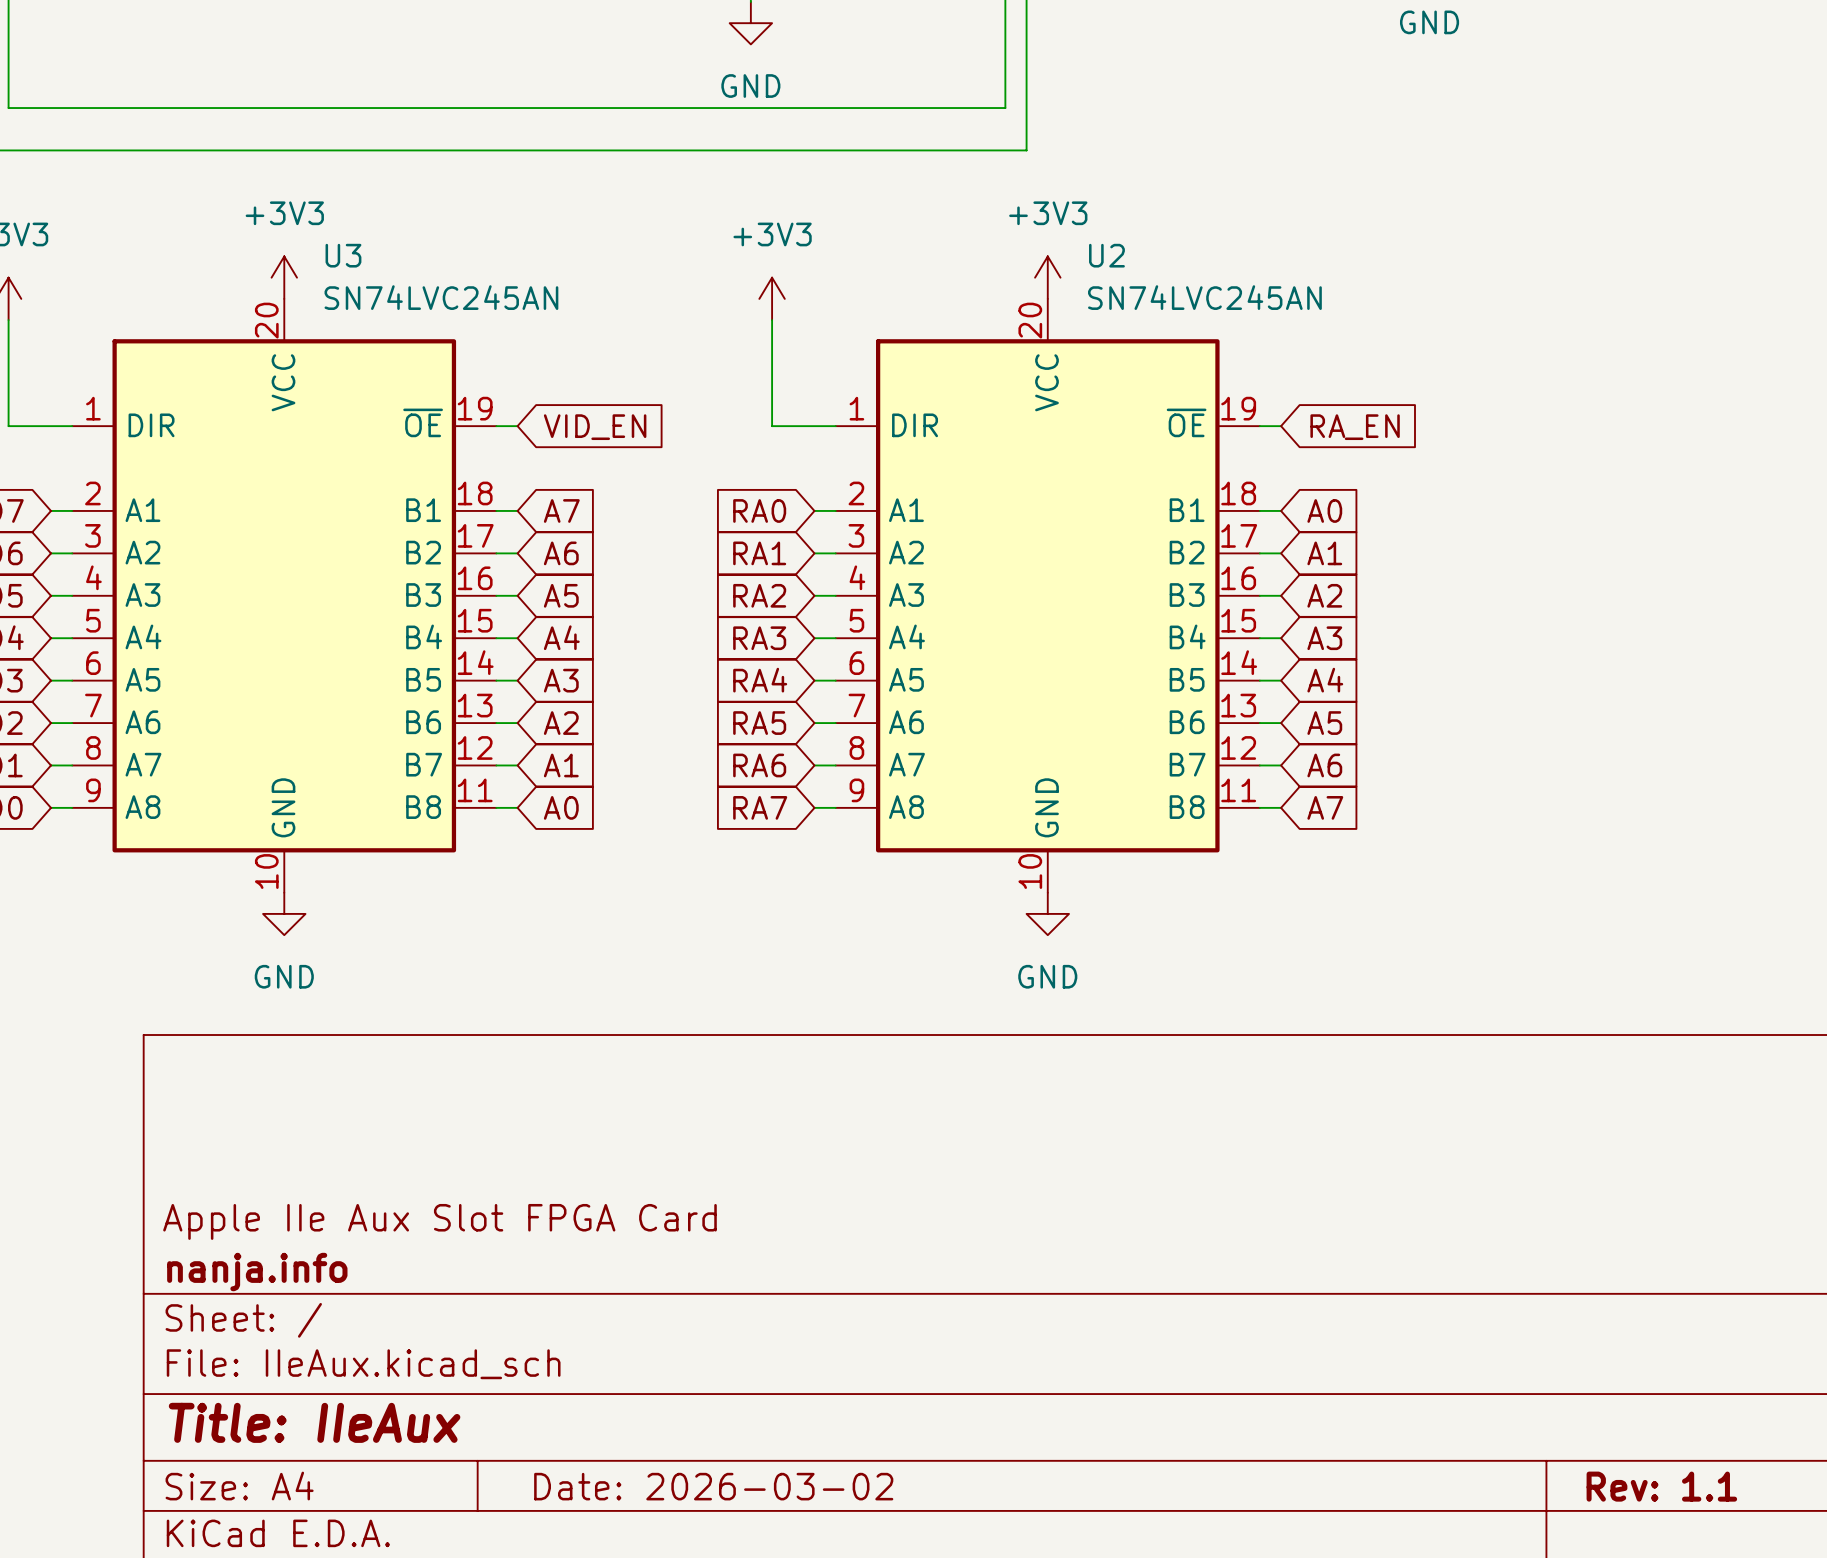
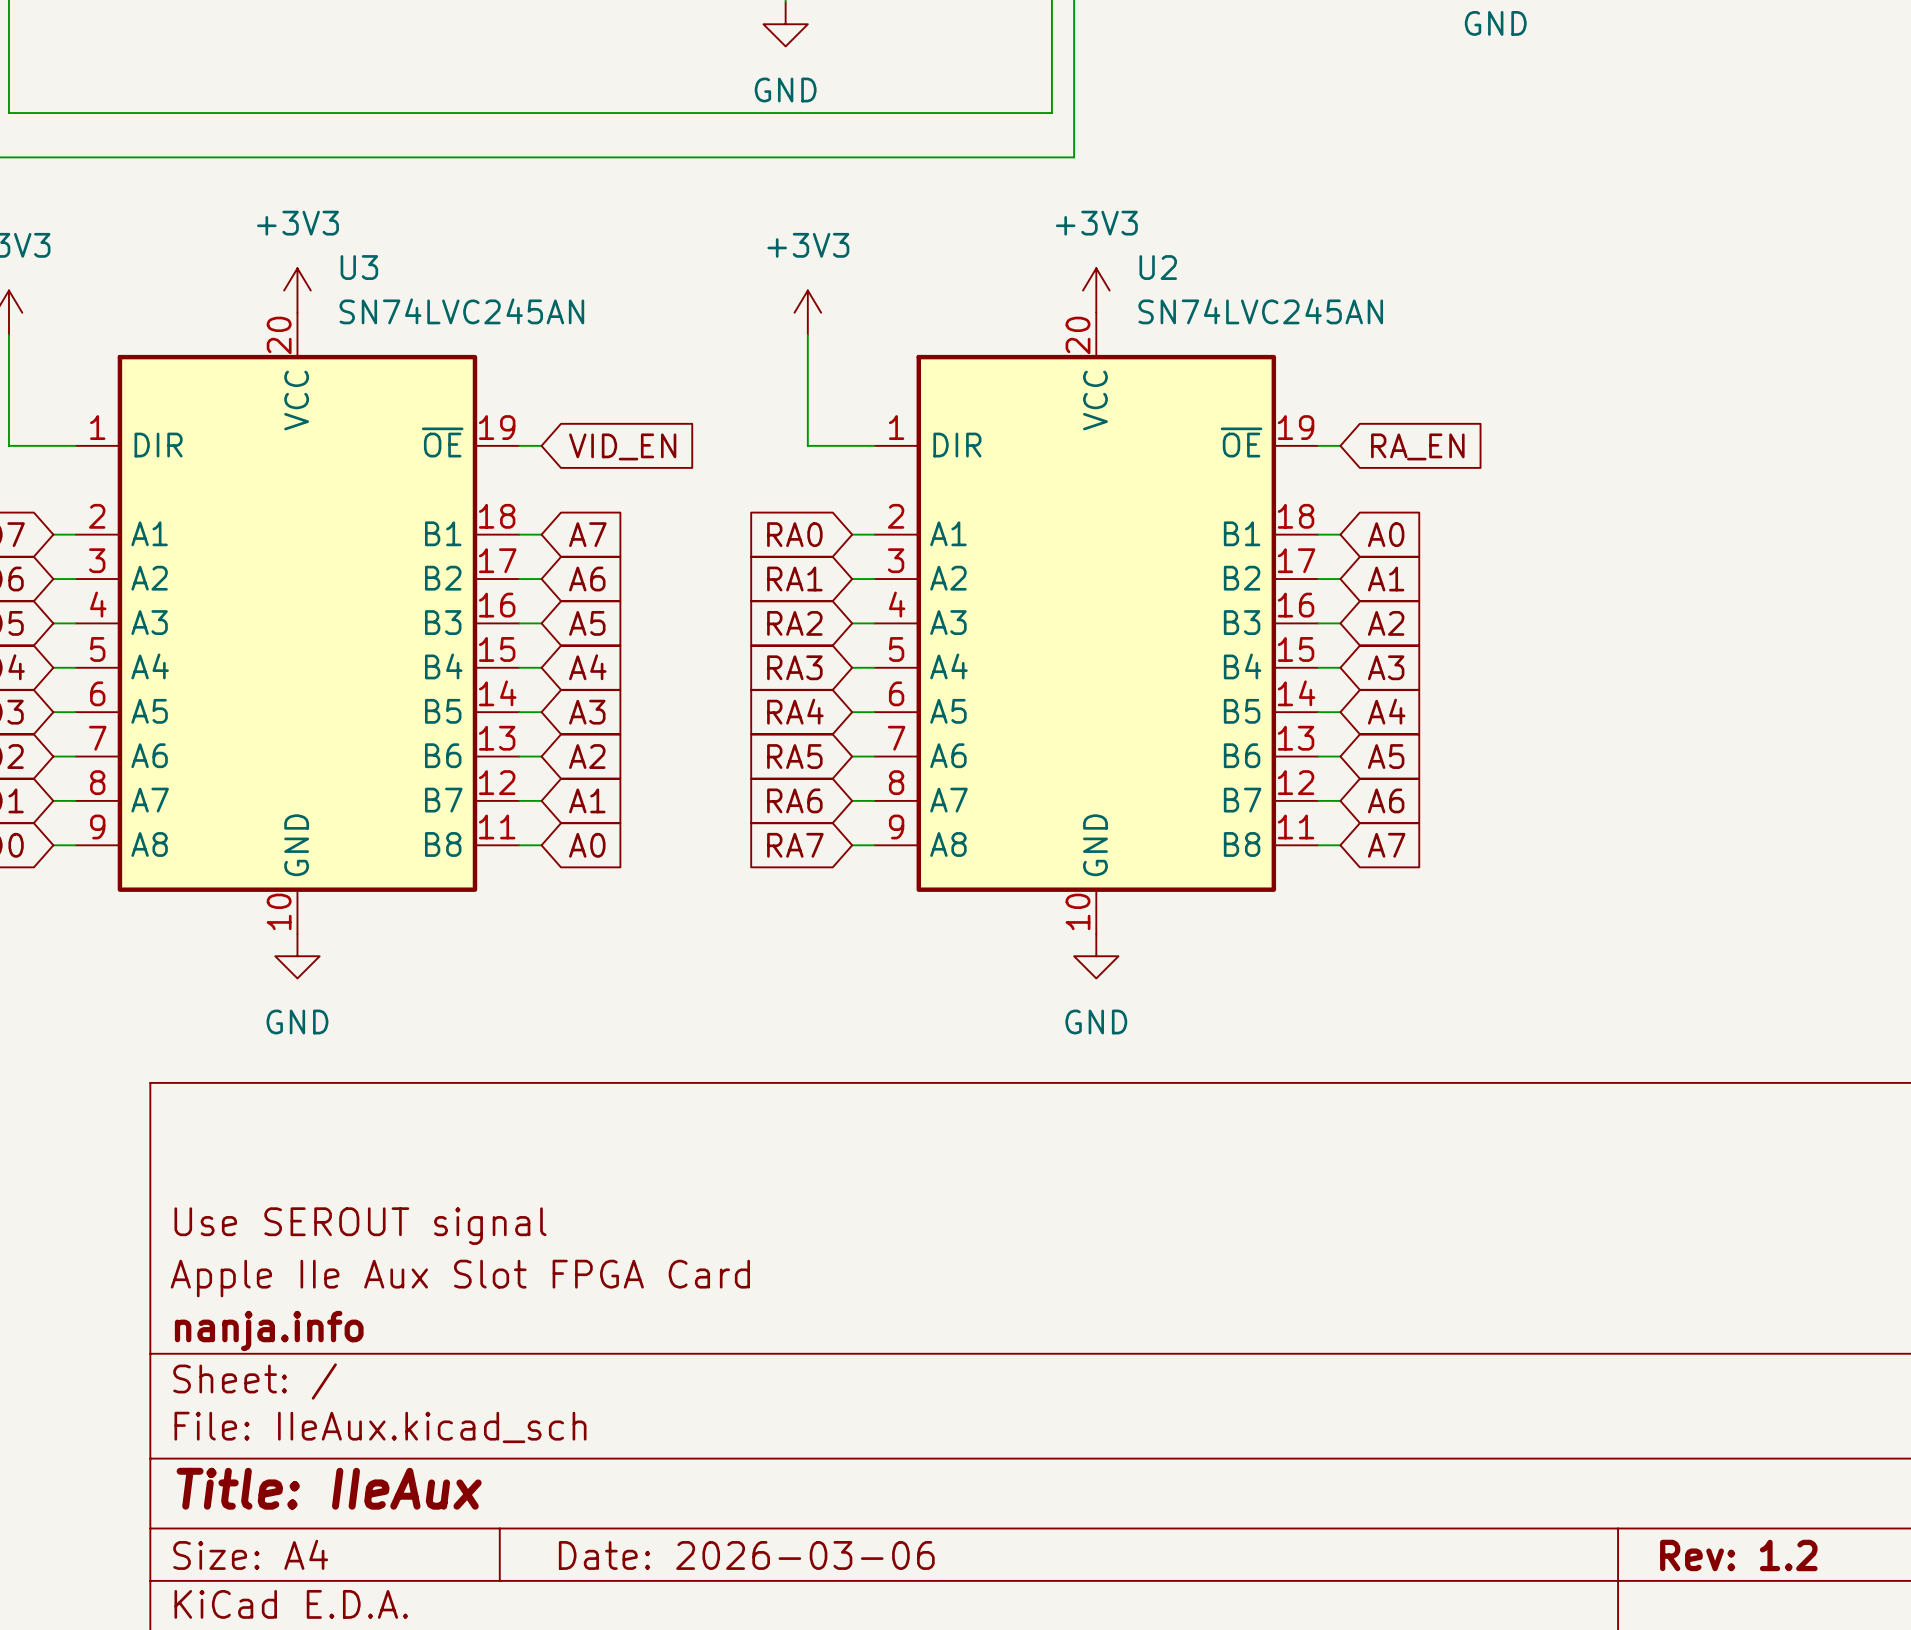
title block: none -> Use SEROUT signal (360, 1226)
title block: Date: 2026-03-02 (713, 1486) -> Date: 2026-03-06 (746, 1555)
title block: Rev: 1.1 (1661, 1486) -> Rev: 1.2 (1738, 1555)

